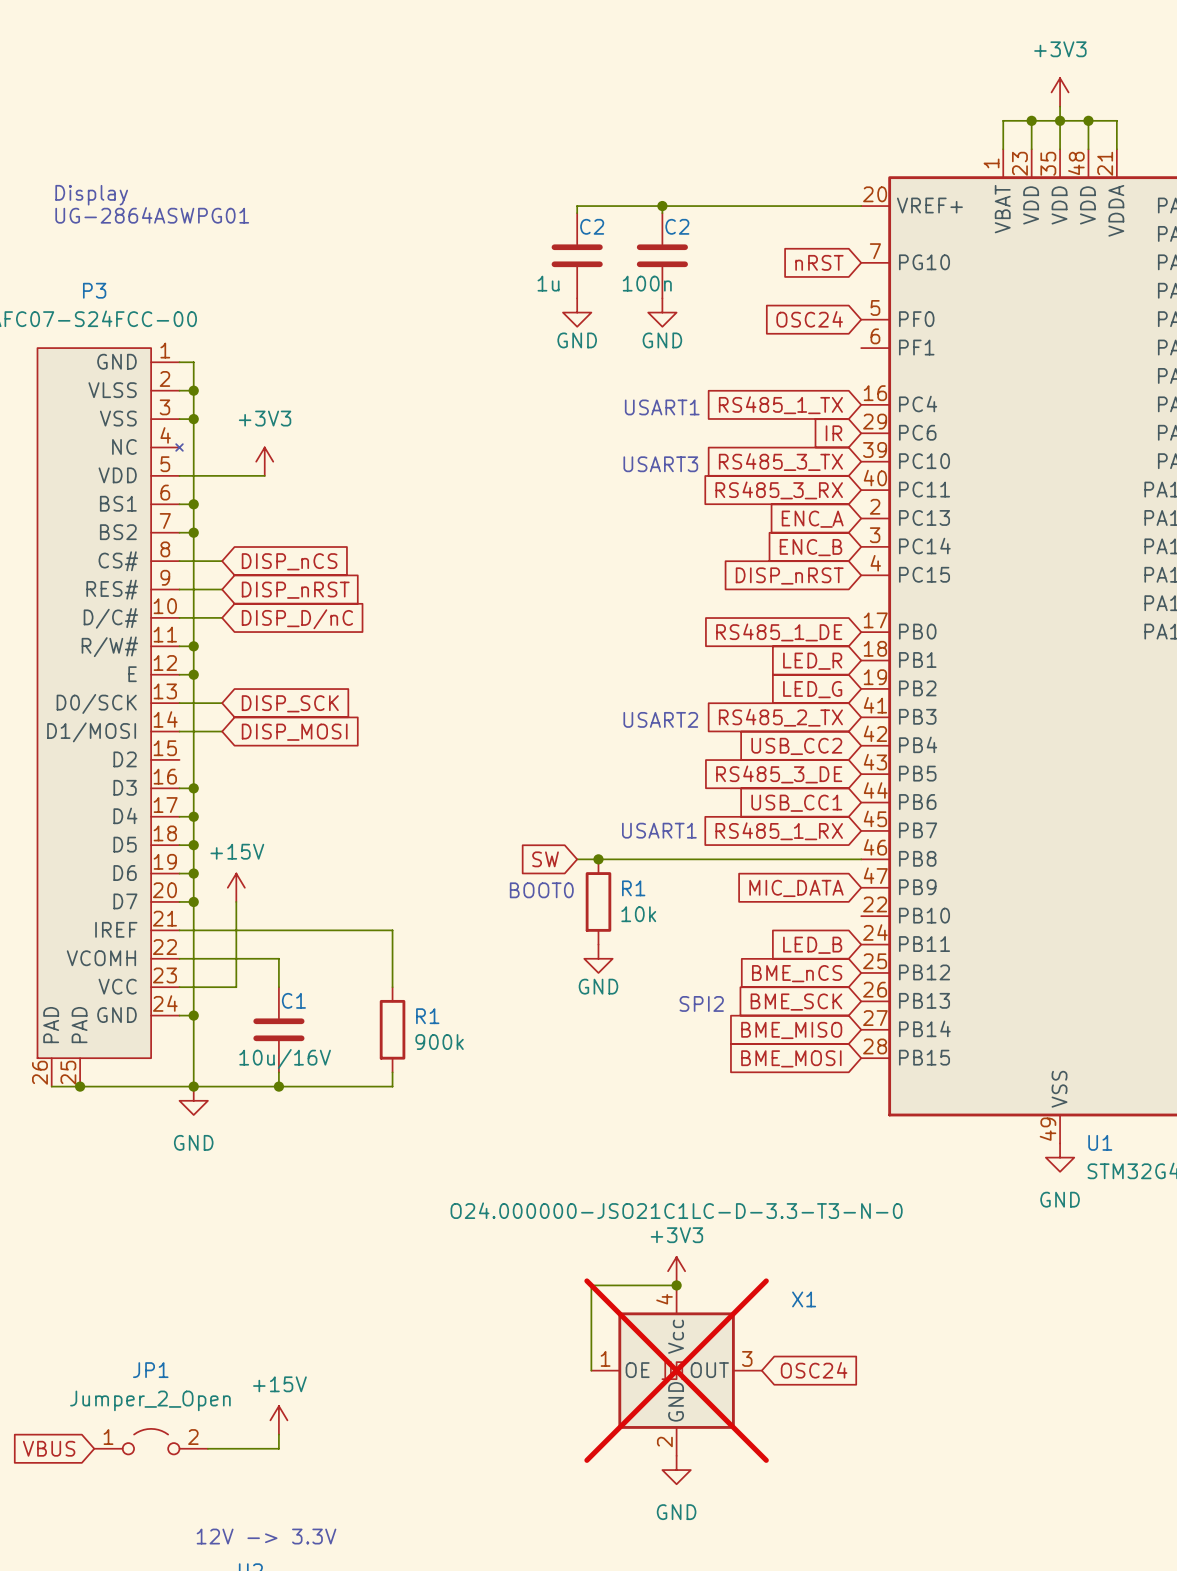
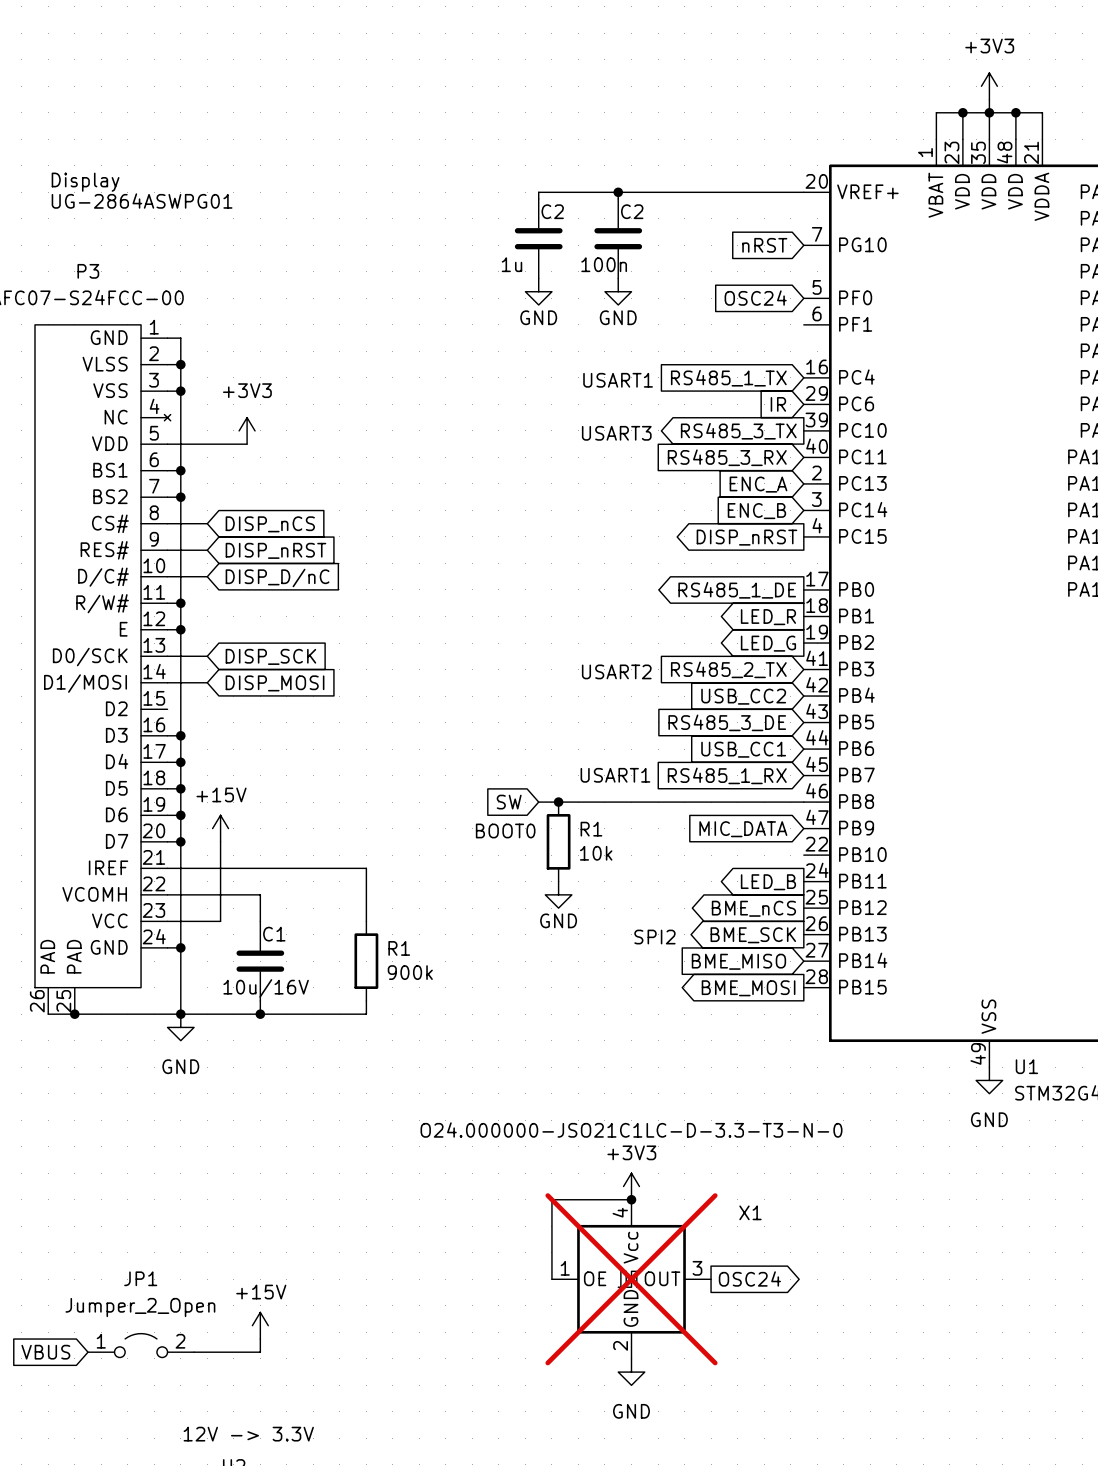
global label shape: input (780, 462) -> output (738, 431)
global label shape: input (789, 575) -> output (746, 537)
global label shape: input (779, 632) -> output (737, 590)
global label shape: input (812, 661) -> output (768, 617)
global label shape: input (812, 689) -> output (768, 643)
global label shape: input (812, 945) -> output (768, 882)
global label shape: input (797, 973) -> output (753, 908)
global label shape: input (796, 1002) -> output (753, 935)
global label shape: input (791, 1058) -> output (748, 988)
global label shape: input (814, 1370) -> output (749, 1278)

